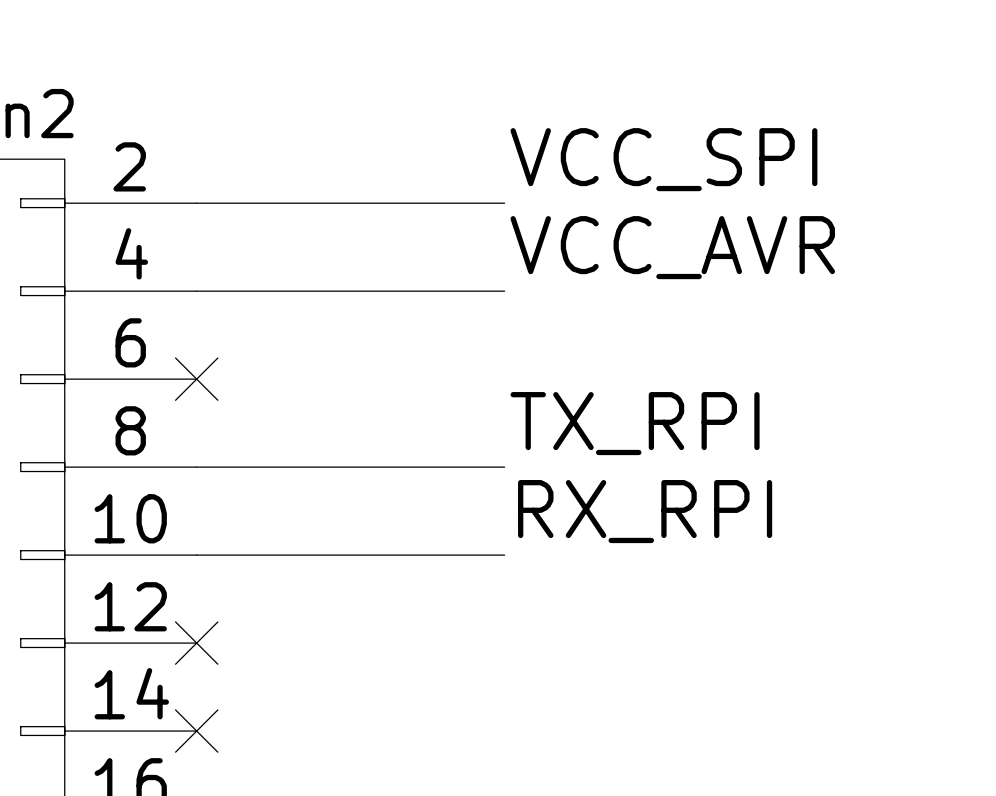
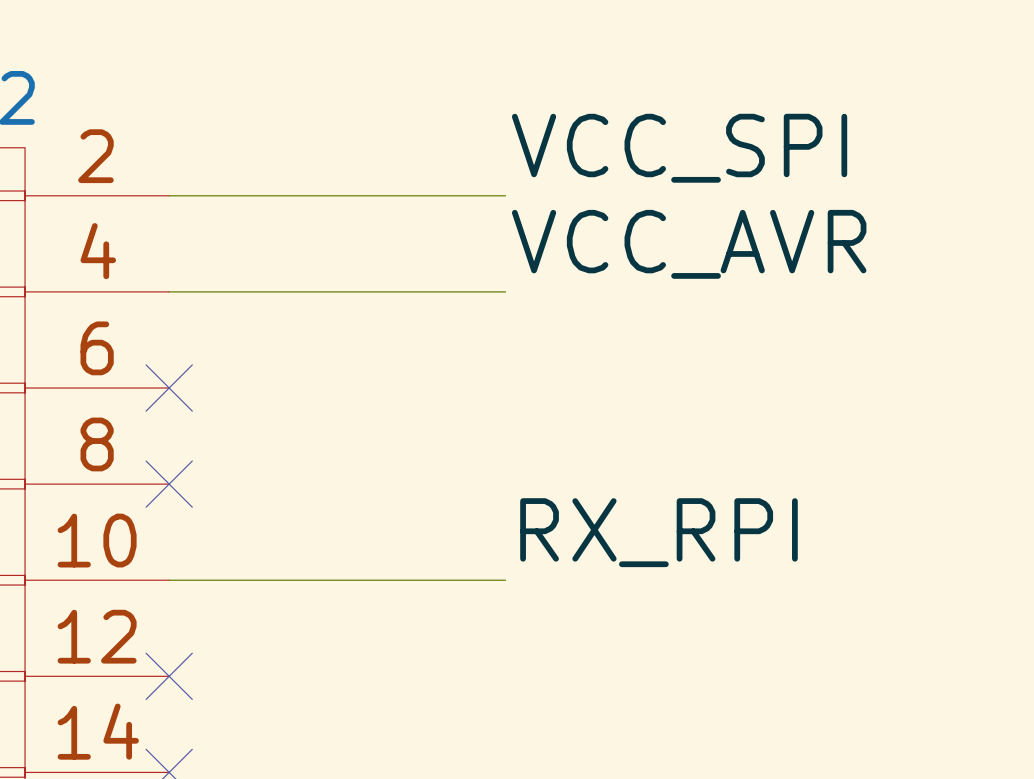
label: TX_RPI (635, 423) -> none
wire: (196, 467) (504, 467) -> none
no-connect mark: none -> (169, 484)

